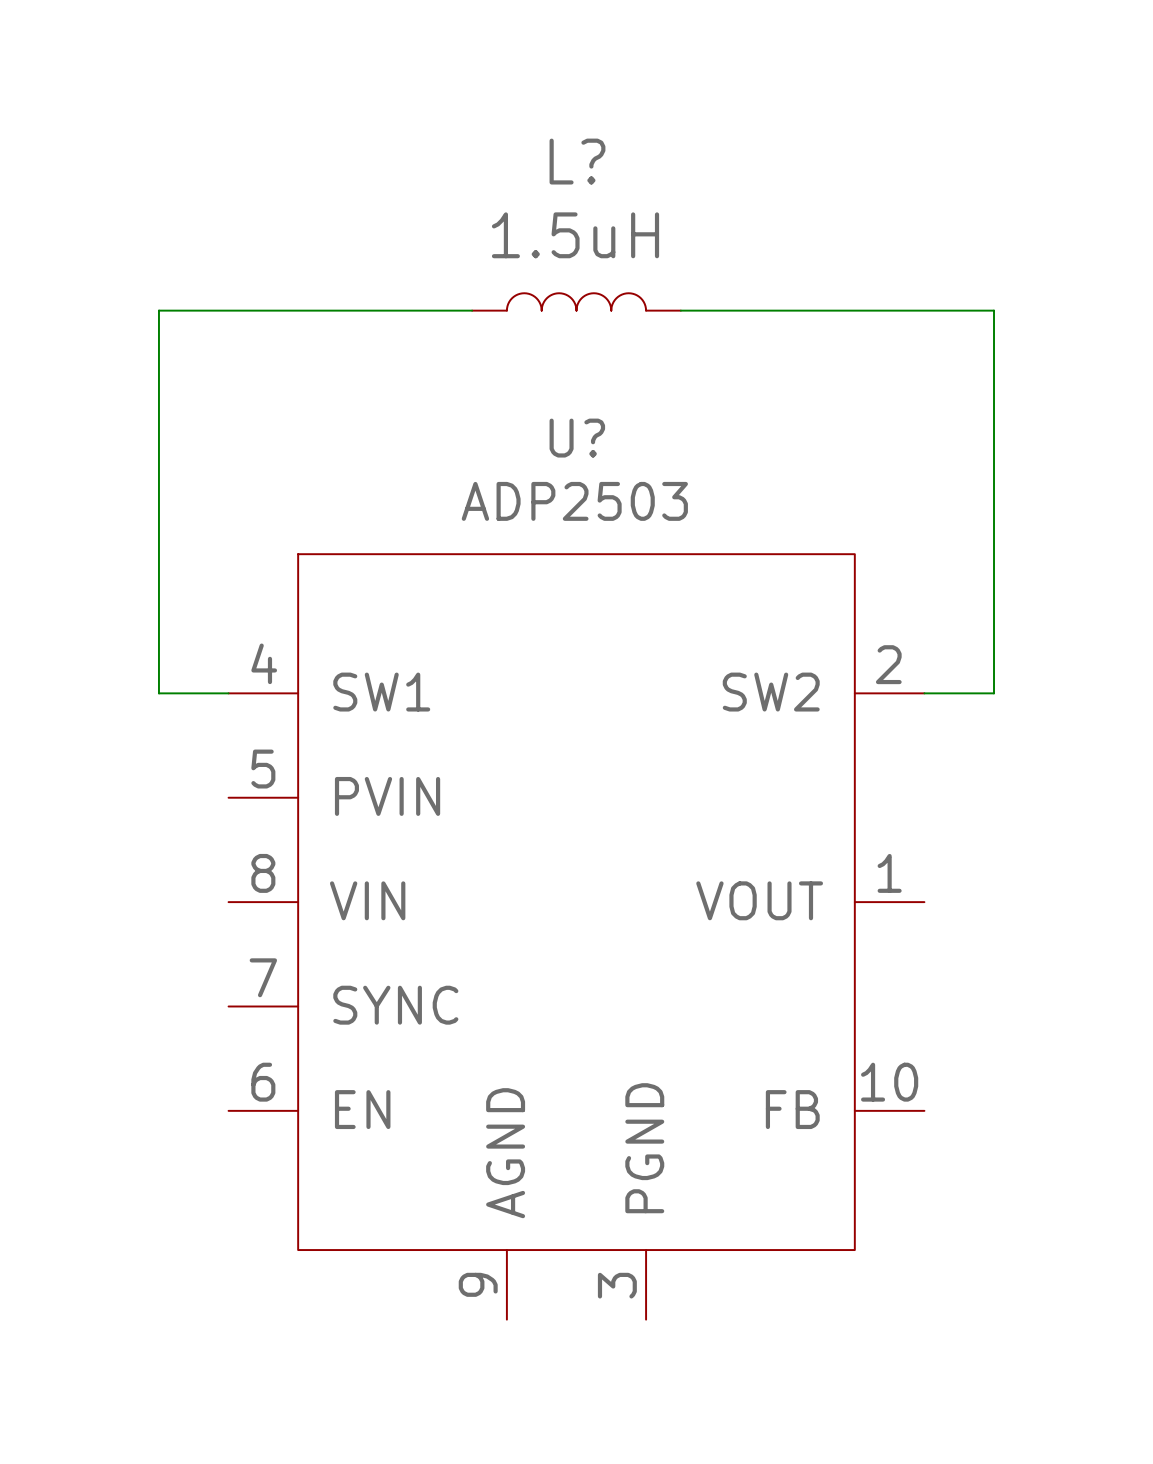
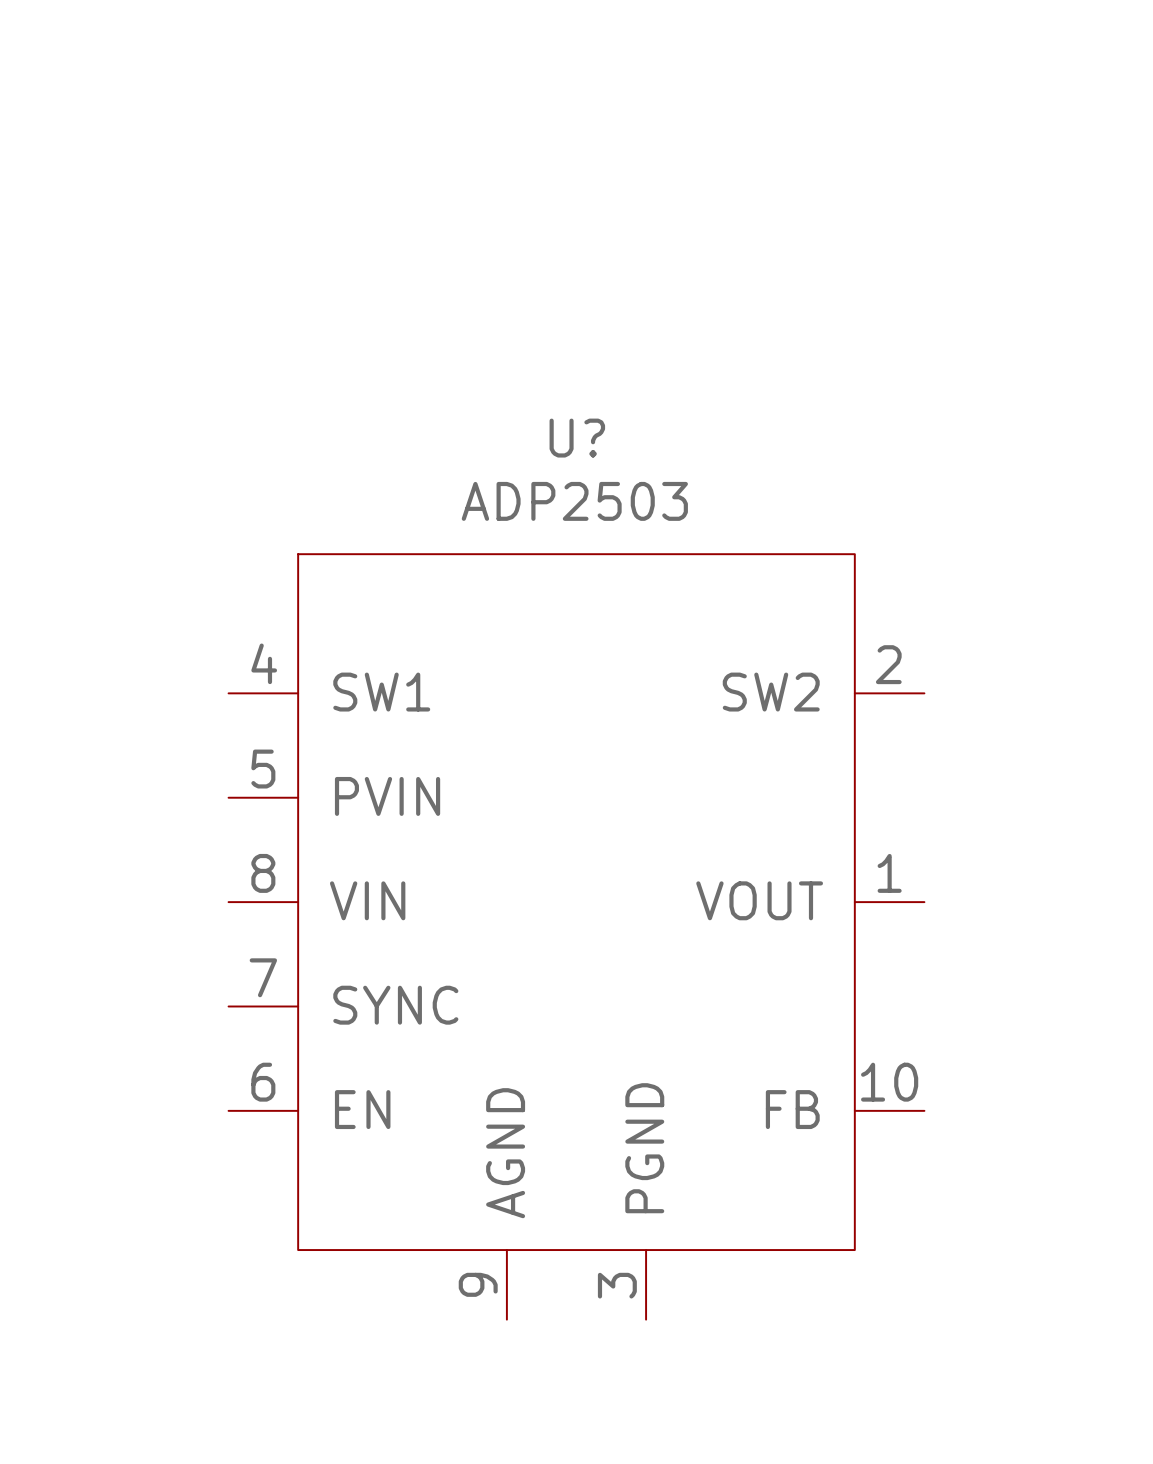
L?: 1.5uH (576, 301) -> none
wire: (472, 310) (158, 310) (158, 693) (228, 693) -> none
wire: (680, 310) (994, 310) (994, 693) (924, 693) -> none

